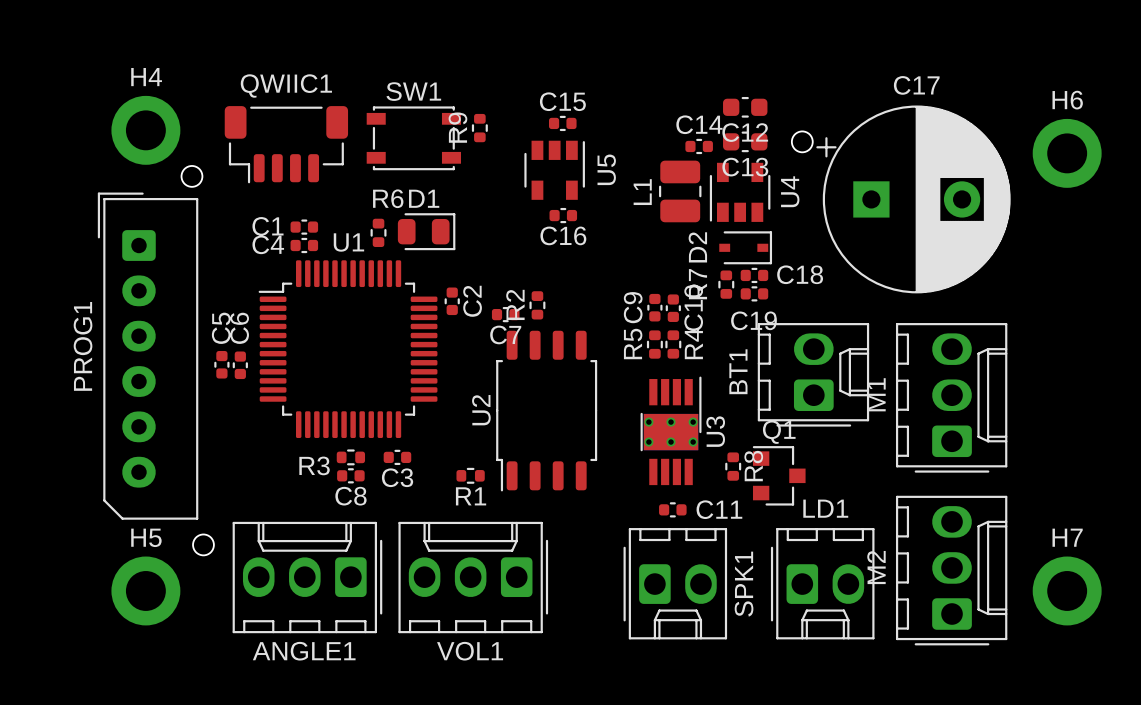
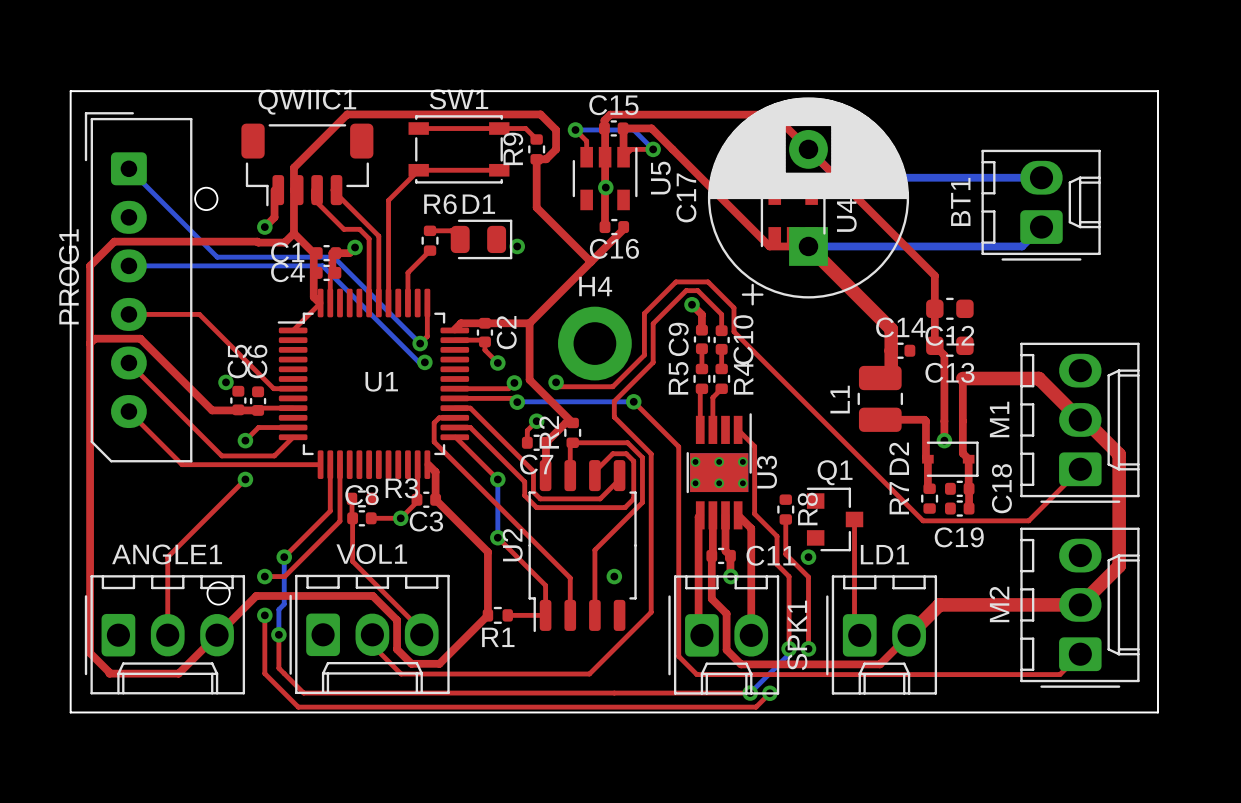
board edge: none -> (70, 91) (1157, 91) (1157, 712) (70, 712) (70, 91)
C12 position: (745, 107) -> (949, 308)
top track: none -> (418, 128) (525, 128) (536, 139)
top track: none -> (604, 128) (604, 120) (610, 114) (773, 114) (934, 275) (934, 345) (944, 355) (944, 440)
top track: none -> (623, 128) (651, 128) (769, 246) (808, 246) (891, 329) (891, 367) (880, 378)
top track: none -> (623, 128) (623, 157) (631, 149) (653, 149)
top track: none -> (605, 129) (605, 227)
top track: none -> (575, 129) (586, 141) (586, 157)
bottom track: none -> (575, 129) (633, 129) (653, 149)
via: none -> (575, 129)
C15 position: (562, 123) -> (613, 128)
R9 position: (479, 128) -> (536, 149)
H4 position: (145, 130) -> (594, 343)
via: none -> (653, 149)
bottom track: none -> (808, 149) (836, 177) (1041, 177)
SW1 position: (413, 138) -> (458, 149)
C13 position: (745, 141) -> (949, 345)
C14 position: (699, 146) -> (900, 350)
bottom track: none -> (128, 168) (217, 257) (333, 257) (420, 343)
top track: none -> (499, 170) (418, 170) (388, 200) (388, 303)
H6: (1067, 153) -> none
via: none -> (605, 187)
top track: none -> (274, 190) (274, 217) (264, 227)
top track: none -> (313, 190) (313, 198) (343, 229) (359, 229) (369, 238) (369, 303)
top track: none -> (332, 190) (378, 236) (378, 303)
U5 position: (554, 170) -> (605, 178)
L1 position: (680, 191) -> (880, 398)
C17 rotation: 0° (913, 199) -> 90° counterclockwise (808, 201)
C17 position: (913, 199) -> (808, 201)
via: none -> (264, 227)
top track: none -> (623, 227) (623, 229) (529, 323)
bottom track: none -> (1041, 227) (1022, 246) (808, 246)
top track: none -> (430, 230) (451, 230) (460, 239)
top track: none -> (293, 233) (293, 167) (347, 114) (540, 114) (556, 129) (556, 149) (546, 159) (536, 159) (536, 207) (590, 261)
top track: none -> (293, 233) (313, 253) (313, 297) (319, 303)
top track: none -> (293, 233) (284, 242) (114, 241) (90, 265) (90, 653) (109, 673) (178, 673) (256, 595) (372, 595) (397, 620) (397, 649) (411, 663) (439, 663) (487, 615) (487, 552) (435, 499) (435, 471) (428, 464)
C16 position: (563, 215) -> (614, 227)
via: none -> (517, 246)
top track: none -> (355, 247) (349, 253) (332, 253) (330, 303)
via: none -> (355, 247)
top track: none -> (430, 250) (407, 272) (407, 303)
D1 position: (426, 231) -> (481, 239)
R6 position: (378, 232) -> (430, 240)
bottom track: none -> (128, 265) (322, 265) (419, 362) (424, 362)
U1 name position: U1 (348, 242) -> U1 (381, 381)
D2 position: (745, 247) -> (950, 459)
top track: none -> (320, 303) (293, 330)
top track: none -> (427, 303) (427, 336) (420, 343)
C18 name rotation: 0° (800, 274) -> 90° counterclockwise (1001, 488)
top track: none -> (691, 304) (701, 314) (701, 330)
via: none -> (691, 304)
C18 position: (754, 275) -> (959, 488)
top track: none -> (128, 314) (199, 314) (273, 388) (293, 388)
R7 position: (726, 284) -> (929, 498)
top track: none -> (529, 323) (460, 323) (454, 329)
top track: none -> (529, 323) (529, 379) (572, 422) (565, 422) (545, 442) (545, 475)
C19 position: (754, 293) -> (959, 508)
top track: none -> (721, 330) (721, 314) (697, 290) (686, 290) (653, 323) (653, 362) (614, 401) (614, 417) (651, 453) (651, 612) (589, 674) (401, 674) (372, 645) (372, 634)
R2 position: (537, 305) -> (572, 432)
top track: none -> (454, 340) (483, 340) (484, 350) (497, 362)
top track: none -> (90, 343) (94, 338) (140, 338) (212, 410) (293, 408)
via: none -> (420, 343)
C7 position: (505, 314) -> (536, 442)
top track: none -> (701, 348) (701, 369)
top track: none -> (721, 349) (721, 368)
top track: none -> (128, 362) (221, 455) (274, 455) (293, 437)
via: none -> (424, 362)
via: none -> (497, 362)
via: none -> (226, 382)
top track: none -> (556, 382) (560, 386) (612, 386) (644, 355) (644, 313) (675, 281) (708, 281) (733, 307) (733, 331) (923, 520) (1028, 520) (1080, 469)
via: none -> (556, 382)
top track: none -> (514, 382) (508, 388) (454, 388)
via: none -> (514, 382)
top track: none -> (701, 388) (700, 390) (700, 429)
top track: none -> (721, 388) (712, 397) (712, 429)
PROG1 position: (148, 356) -> (138, 287)
top track: none -> (454, 398) (513, 398) (517, 402)
top track: none -> (633, 401) (678, 446) (678, 656) (696, 674) (1059, 674) (1080, 654)
bottom track: none -> (633, 401) (517, 402)
via: none -> (633, 401)
via: none -> (517, 402)
top track: none -> (454, 408) (470, 408) (533, 471) (533, 492) (540, 498) (600, 498) (619, 479) (619, 475)
top track: none -> (128, 411) (182, 464) (320, 464)
BT1 position: (813, 374) -> (1041, 205)
top track: none -> (454, 417) (439, 417) (434, 422) (434, 441) (570, 577) (570, 615)
top track: none -> (880, 419) (925, 421) (925, 457) (927, 459) (927, 487) (929, 488)
top track: none -> (536, 421) (527, 430) (527, 442)
via: none -> (536, 421)
top track: none -> (293, 427) (258, 427) (245, 440)
top track: none -> (454, 427) (470, 427) (524, 481) (524, 495) (536, 507) (625, 507) (633, 498) (633, 461) (626, 453) (612, 453) (594, 471) (594, 475)
top track: none -> (738, 429) (754, 446) (754, 513) (777, 536) (777, 564) (789, 576) (789, 648)
M1 position: (951, 397) -> (1079, 422)
top track: none -> (454, 437) (497, 479)
via: none -> (245, 440)
via: none -> (944, 440)
U2 position: (546, 411) -> (582, 546)
top track: none -> (330, 464) (330, 511) (284, 557)
top track: none -> (339, 464) (339, 521) (284, 576) (264, 576)
top track: none -> (417, 464) (416, 502) (400, 518) (371, 518)
top track: none -> (570, 475) (570, 445) (572, 442) (627, 442) (642, 457) (642, 502) (594, 550) (594, 615)
top track: none -> (245, 479) (167, 557) (167, 635)
via: none -> (245, 479)
bottom track: none -> (497, 479) (497, 537)
via: none -> (497, 479)
top track: none -> (352, 498) (352, 561) (421, 630) (421, 634)
R3 position: (350, 457) -> (361, 498)
R3 name position: R3 (314, 465) -> R3 (401, 488)
top track: none -> (969, 508) (968, 459) (962, 453) (962, 378) (1038, 378) (1080, 419) (1084, 419) (1119, 454) (1119, 566) (1080, 604) (939, 604) (880, 664) (741, 664) (726, 649) (726, 613) (711, 598) (712, 515)
top track: none -> (700, 515) (698, 516) (698, 632) (701, 635)
top track: none -> (725, 515) (725, 550) (730, 555) (730, 576)
top track: none -> (738, 515) (751, 528) (751, 635)
via: none -> (400, 518)
C8 position: (350, 475) -> (361, 518)
R1 position: (470, 475) -> (497, 615)
top track: none -> (785, 519) (785, 554) (808, 577) (808, 648)
top track: none -> (854, 519) (854, 630) (859, 635)
top track: none -> (497, 537) (545, 585) (545, 615) (507, 615)
via: none -> (497, 537)
C8 name position: C8 (350, 496) -> C8 (362, 495)
bottom track: none -> (284, 557) (284, 604) (278, 609) (278, 634)
via: none -> (284, 557)
via: none -> (808, 557)
via: none -> (264, 576)
via: none -> (614, 576)
via: none -> (730, 576)
top track: none -> (264, 615) (264, 673) (298, 707) (756, 707) (769, 693)
via: none -> (264, 615)
M2 position: (951, 570) -> (1079, 607)
ANGLE1 rotation: 0° (307, 577) -> 180° (164, 634)
ANGLE1 position: (307, 577) -> (164, 634)
VOL1 rotation: 0° (473, 577) -> 180° (369, 634)
VOL1 position: (473, 577) -> (369, 634)
top track: none -> (278, 634) (278, 668) (303, 693) (750, 693)
via: none -> (278, 634)
H5: (145, 590) -> none
H7: (1067, 590) -> none
bottom track: none -> (789, 648) (789, 654) (750, 693)
via: none -> (789, 648)
via: none -> (808, 648)
via: none -> (750, 693)
via: none -> (769, 693)

